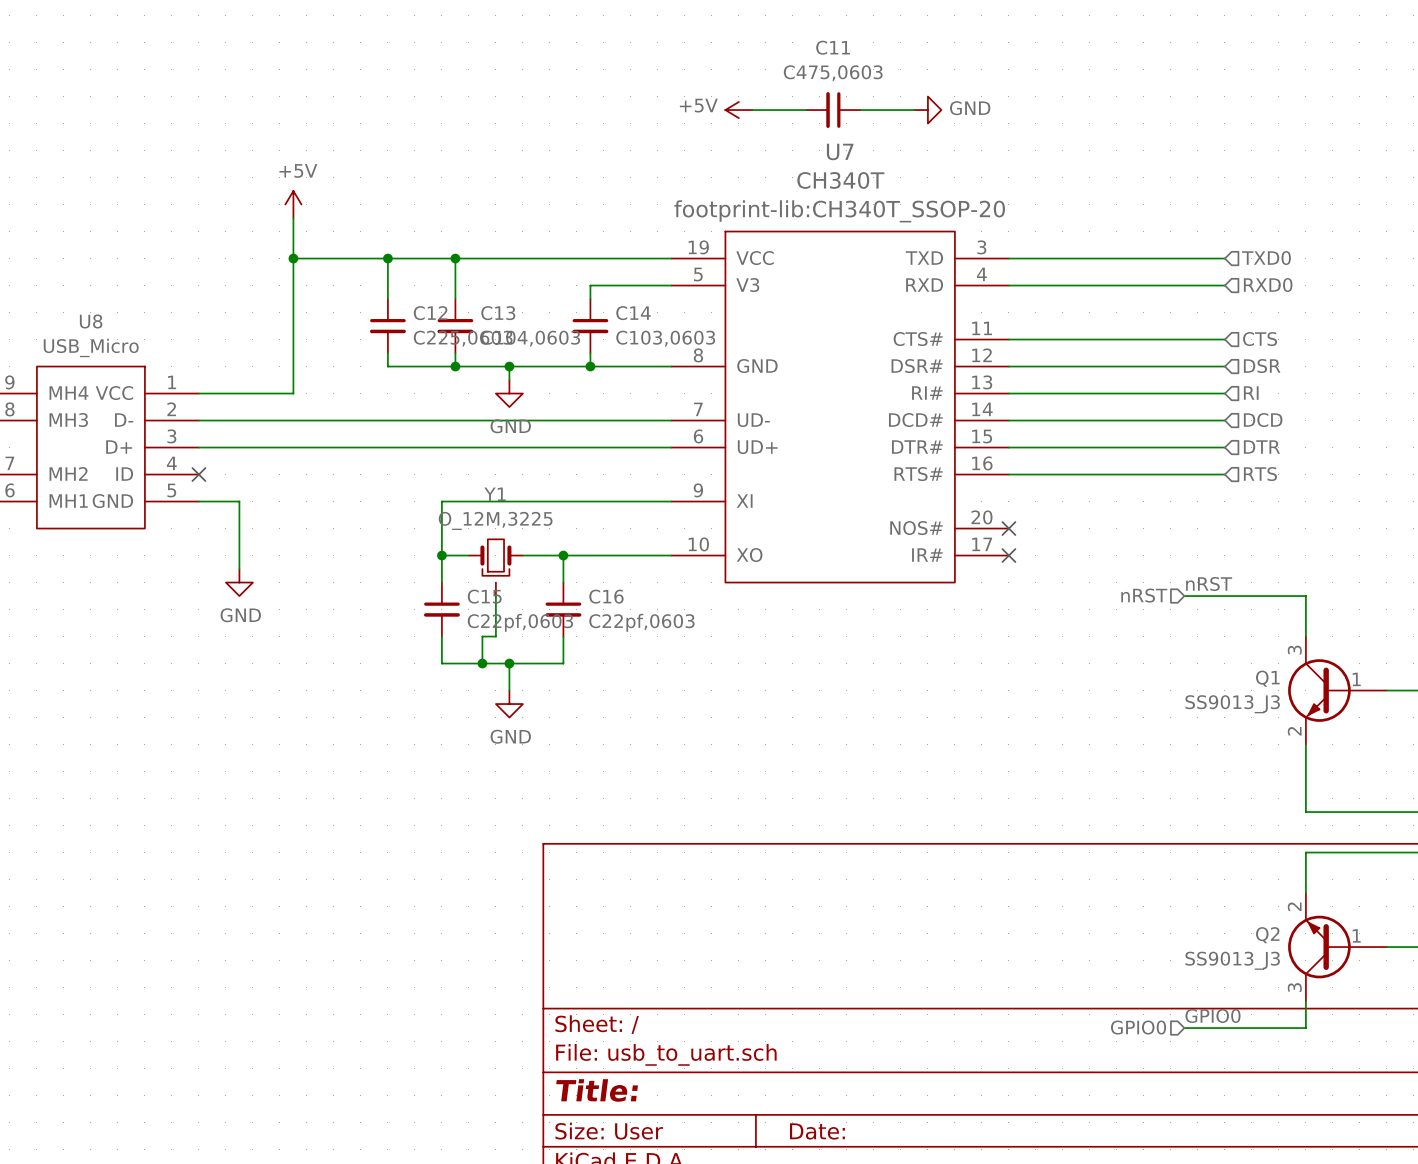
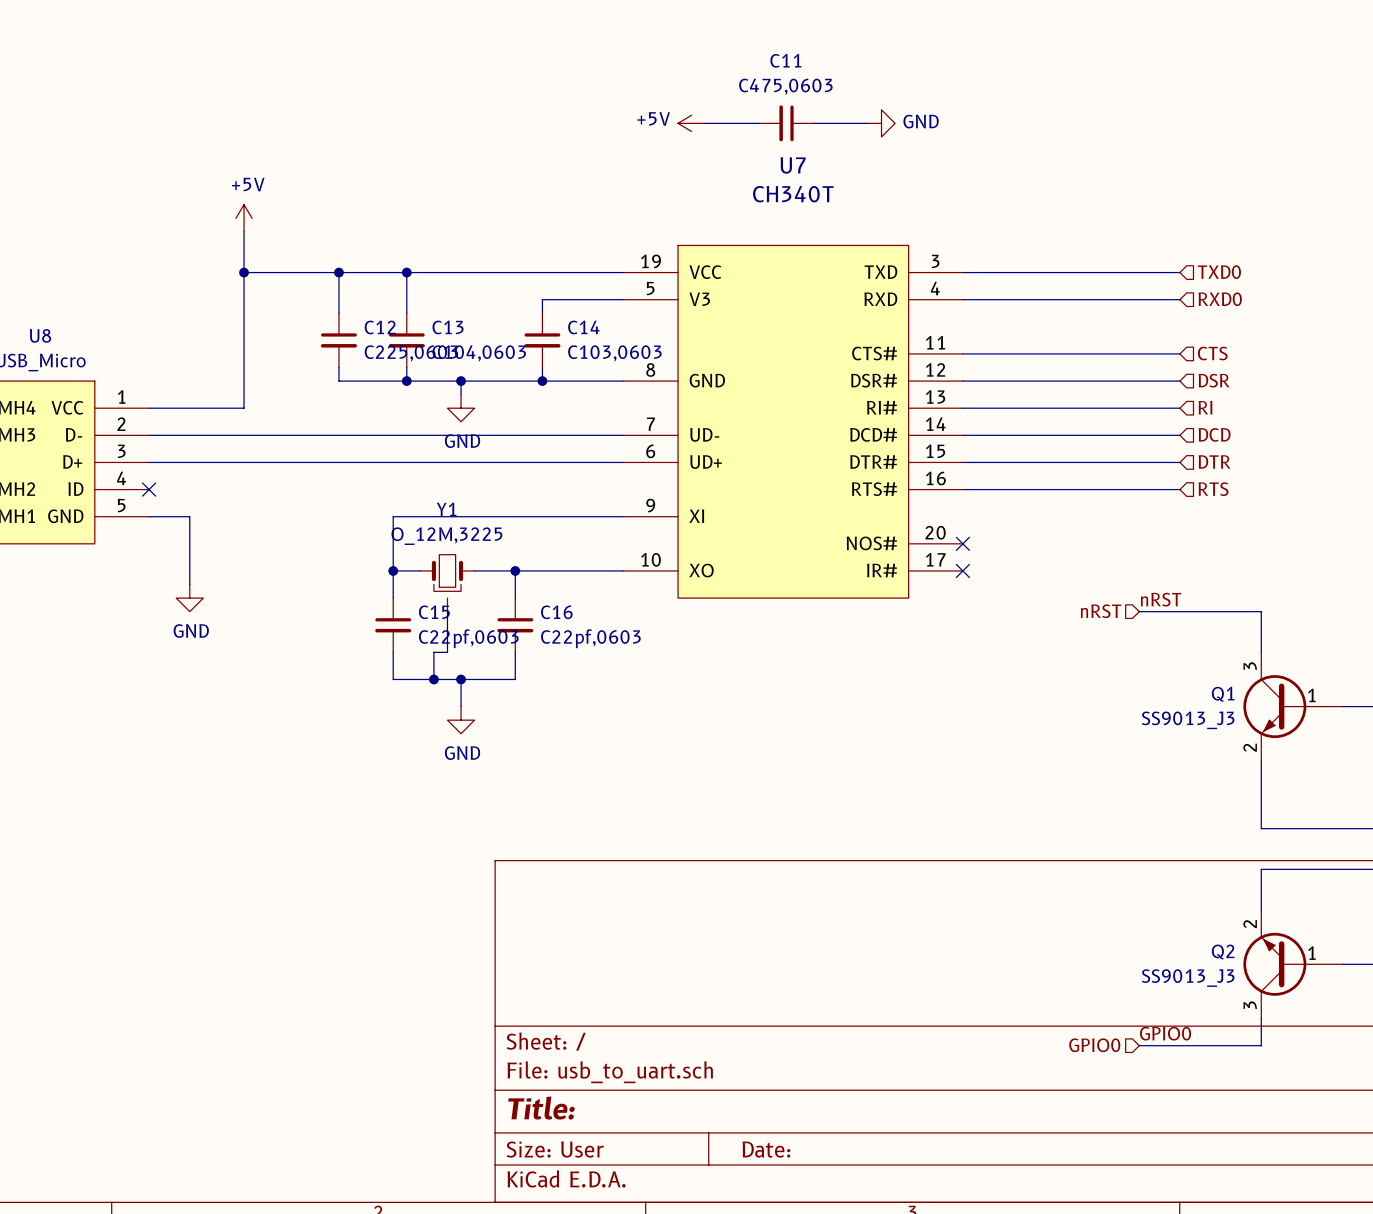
U7 text: footprint-lib:CH340T_SSOP-20 (839, 211) -> none

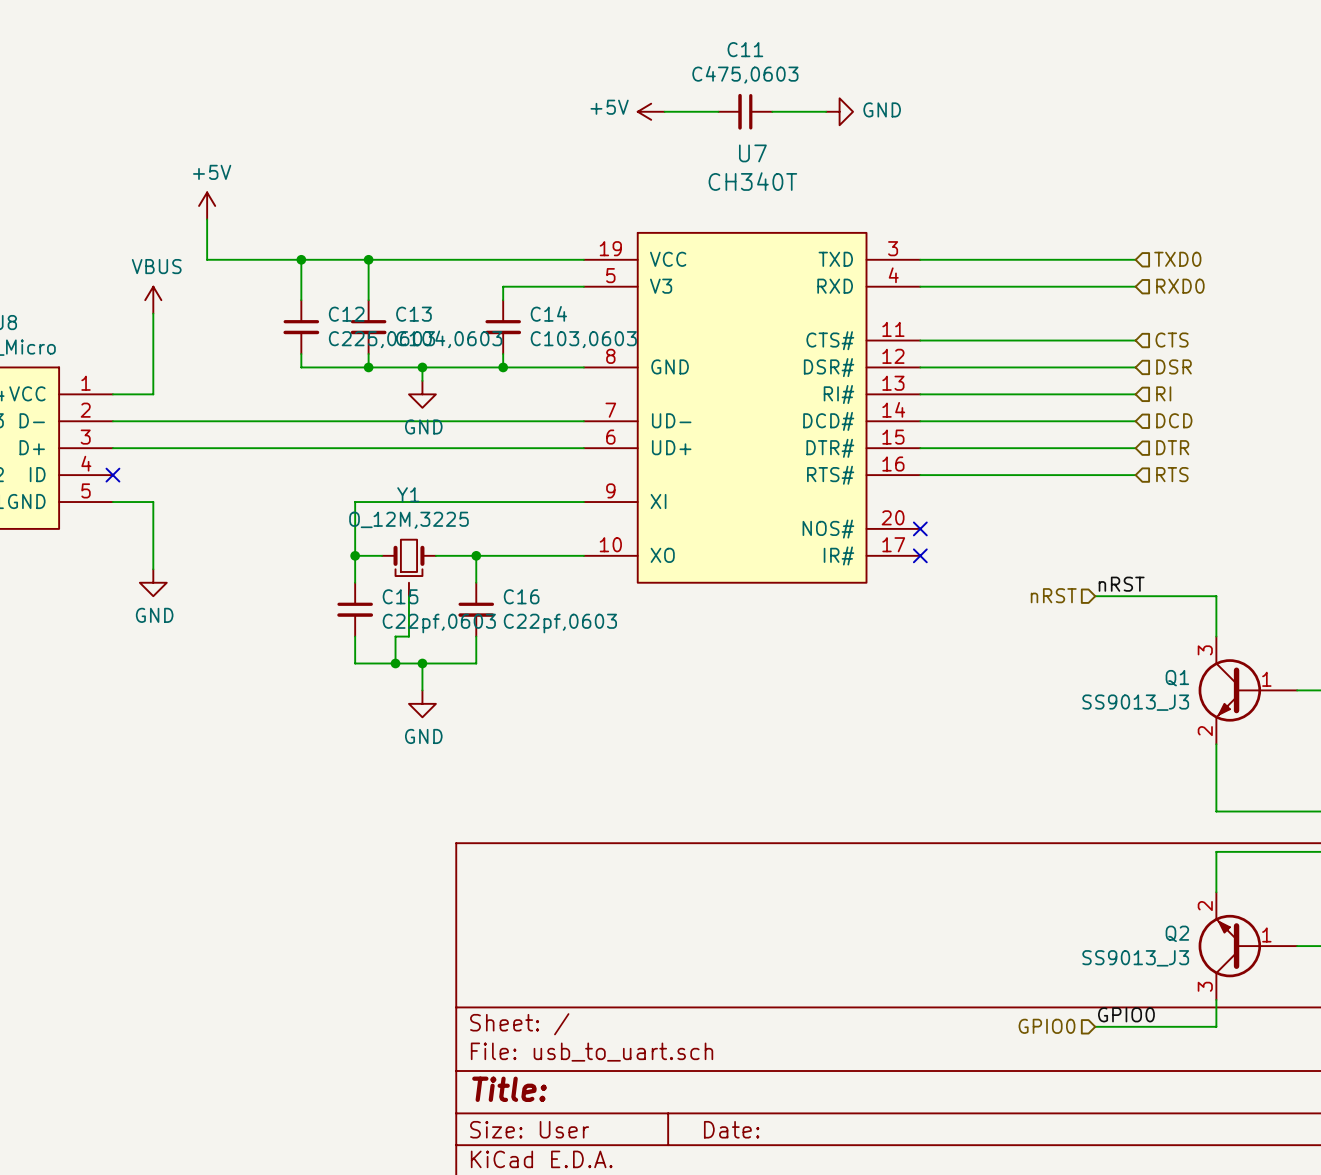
wire: (244, 272) (244, 408) (189, 408) -> (153, 313) (153, 394)
junction: (244, 272) -> none
power symbol: none -> VBUS (153, 300)

